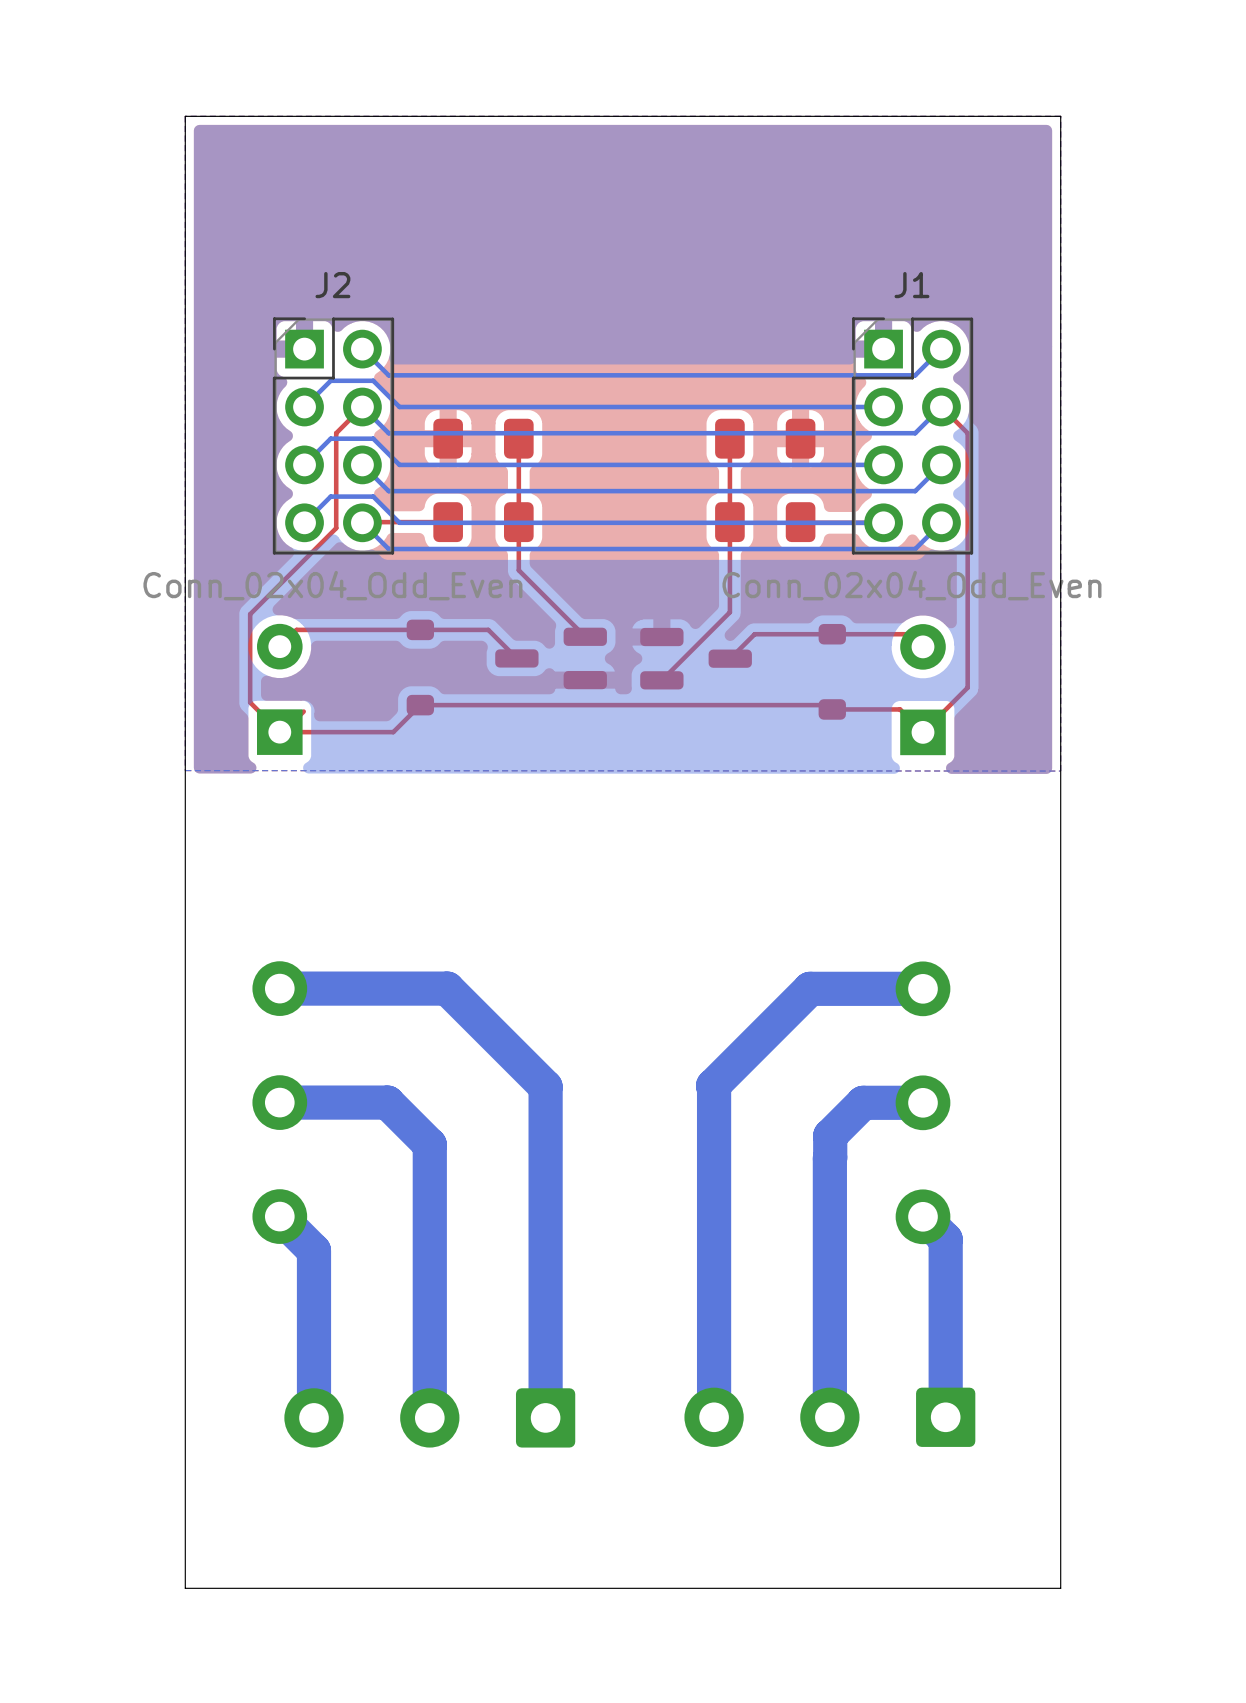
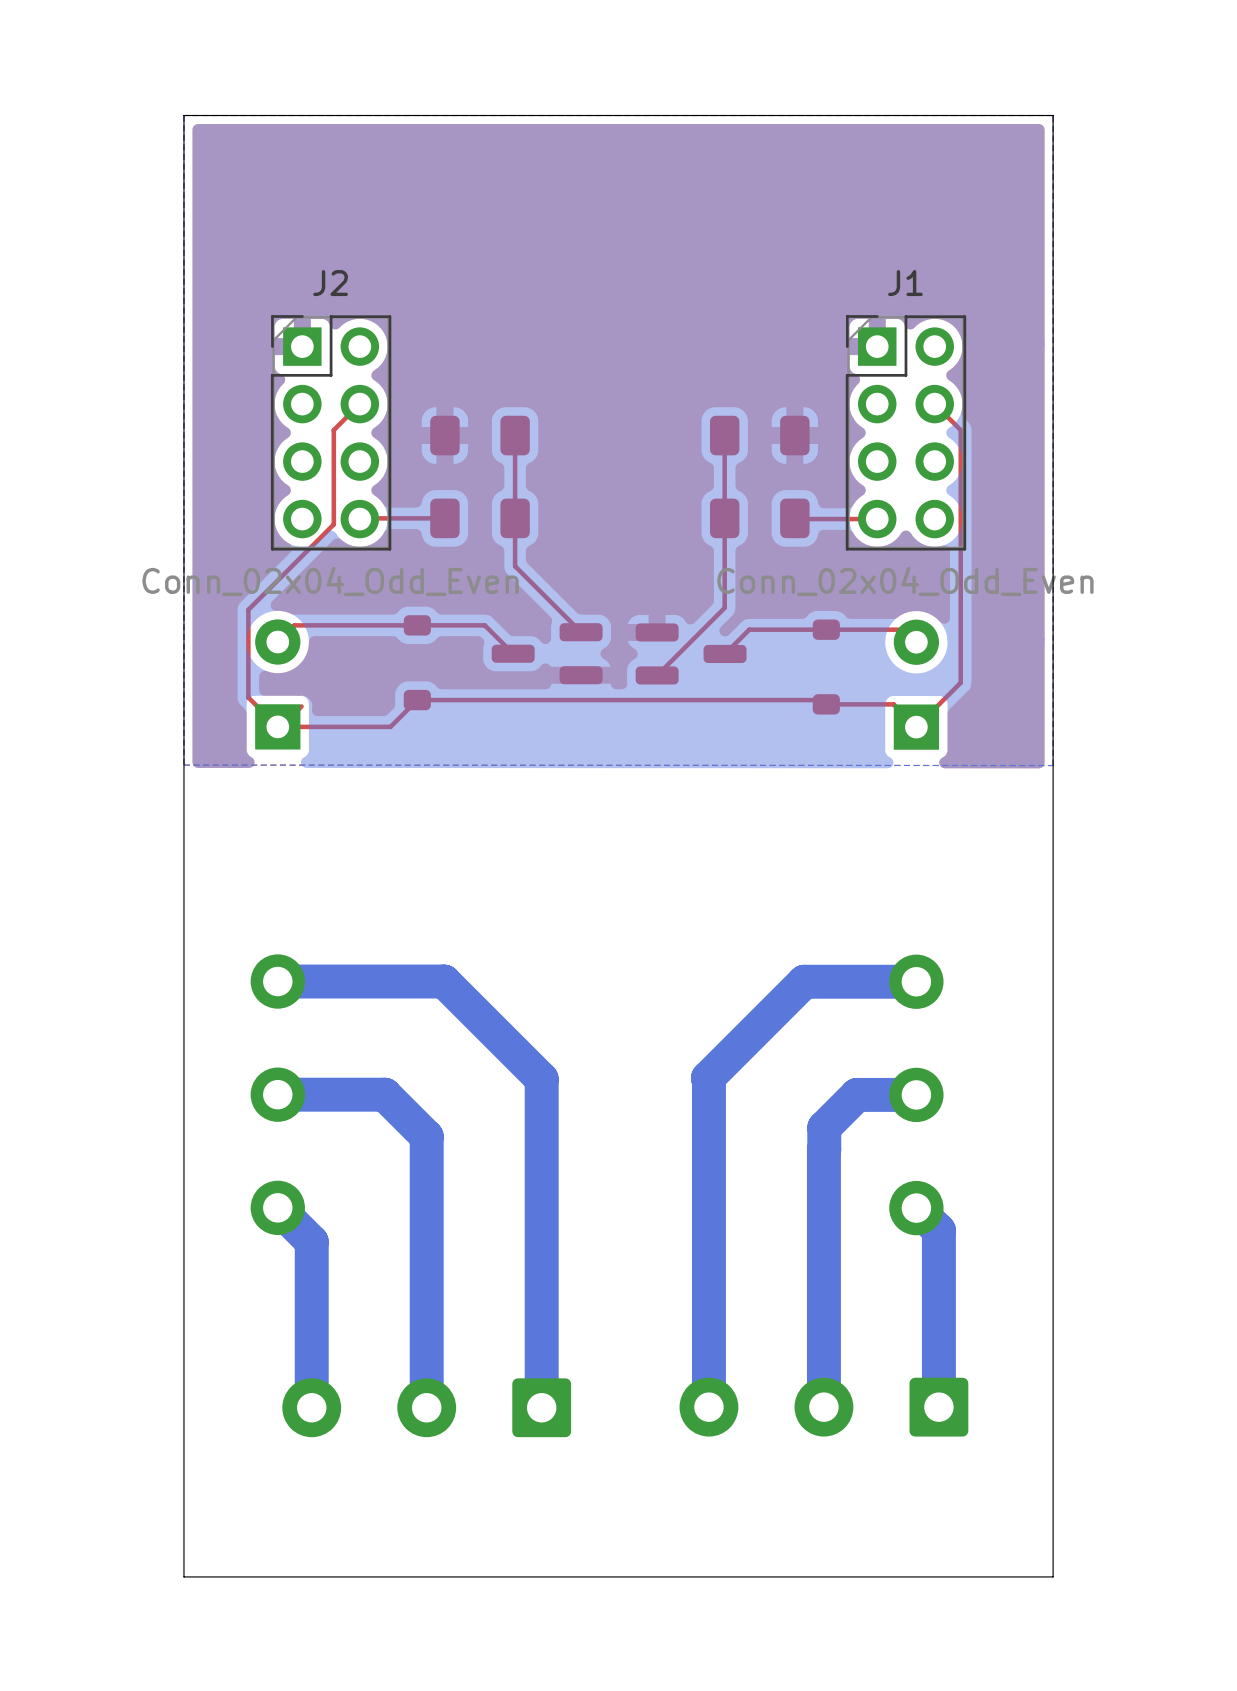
bottom track: (941, 349) (915, 375) (388, 375) (362, 349) -> none
bottom track: (883, 407) (399, 407) (373, 380) (330, 380) (304, 407) -> none
bottom track: (941, 407) (915, 433) (388, 433) (362, 407) -> none
bottom track: (883, 464) (399, 464) (373, 438) (330, 438) (304, 464) -> none
bottom track: (941, 464) (915, 491) (388, 491) (362, 464) -> none
bottom track: (883, 522) (399, 522) (373, 496) (330, 496) (304, 522) -> none
bottom track: (941, 522) (915, 549) (388, 549) (362, 522) -> none

